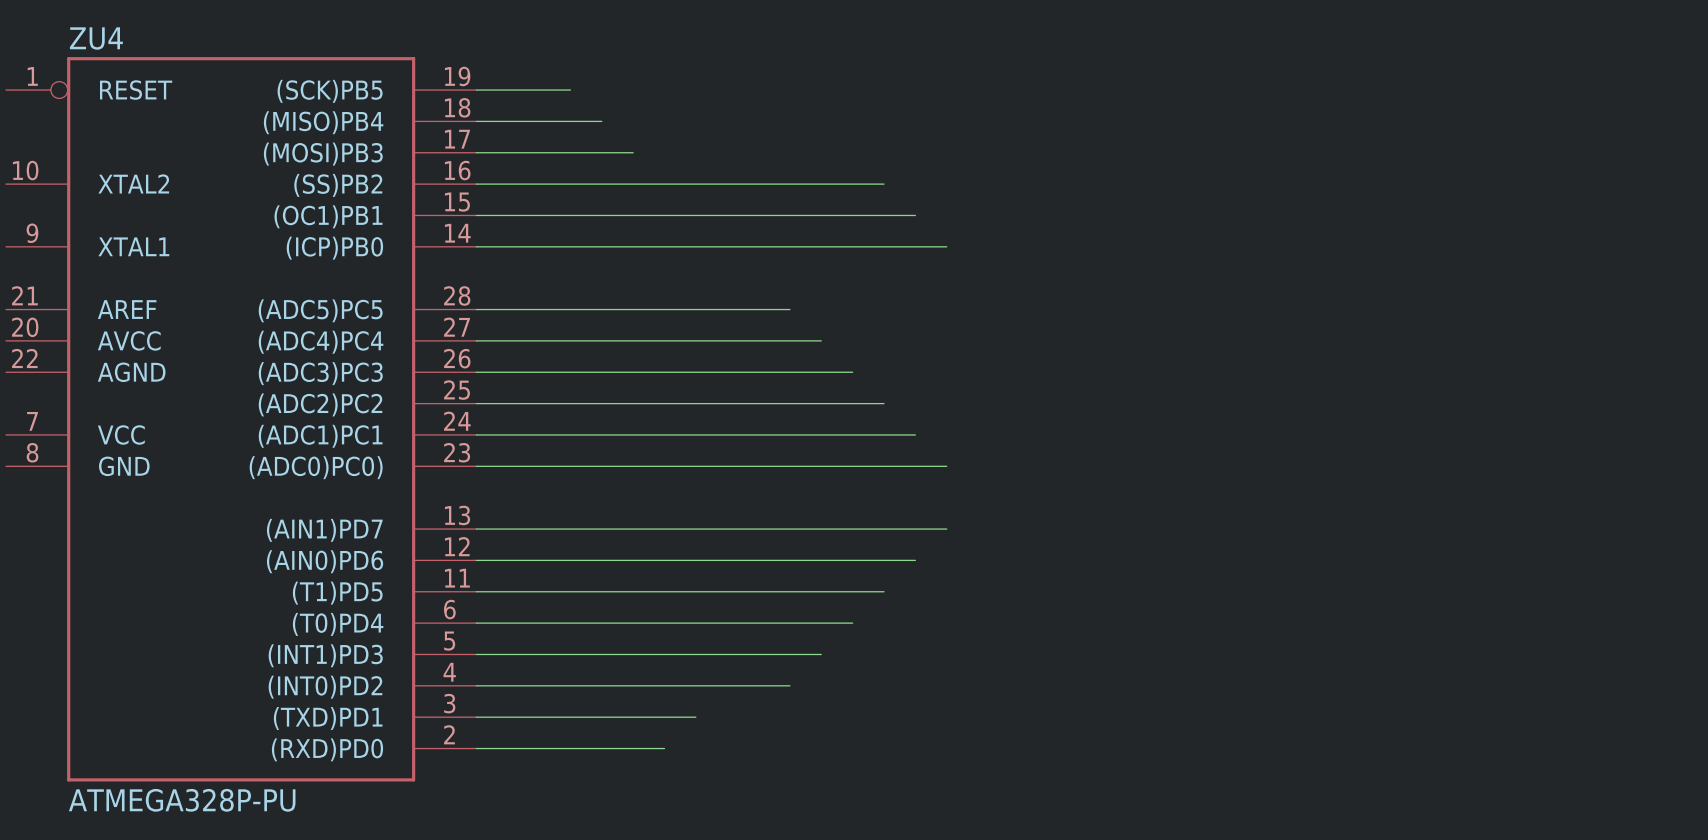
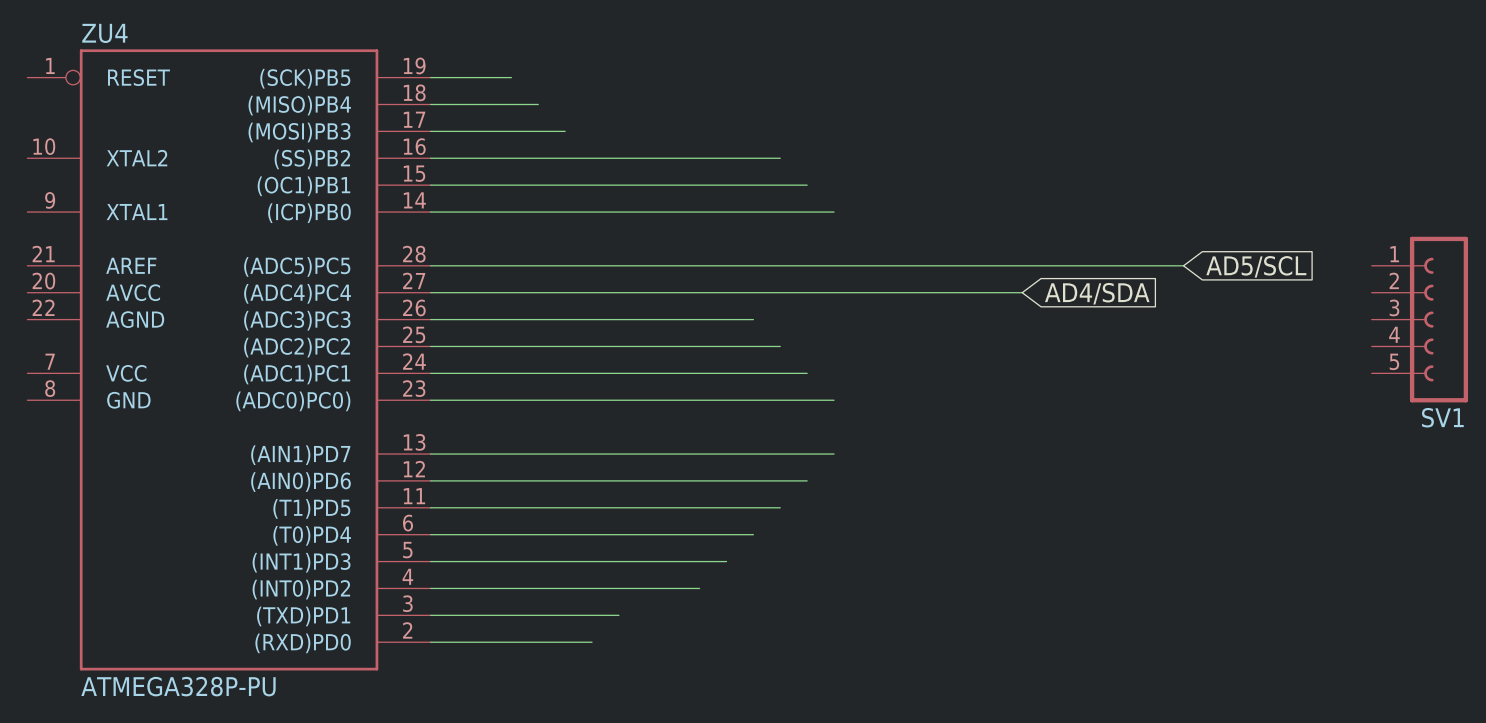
wire: none -> (699, 265) (1183, 265)
global label: none -> AD5/SCL (1256, 266)
wire: none -> (726, 292) (1022, 292)
global label: none -> AD4/SDA (1097, 293)
SV1: none -> (1419, 319)

